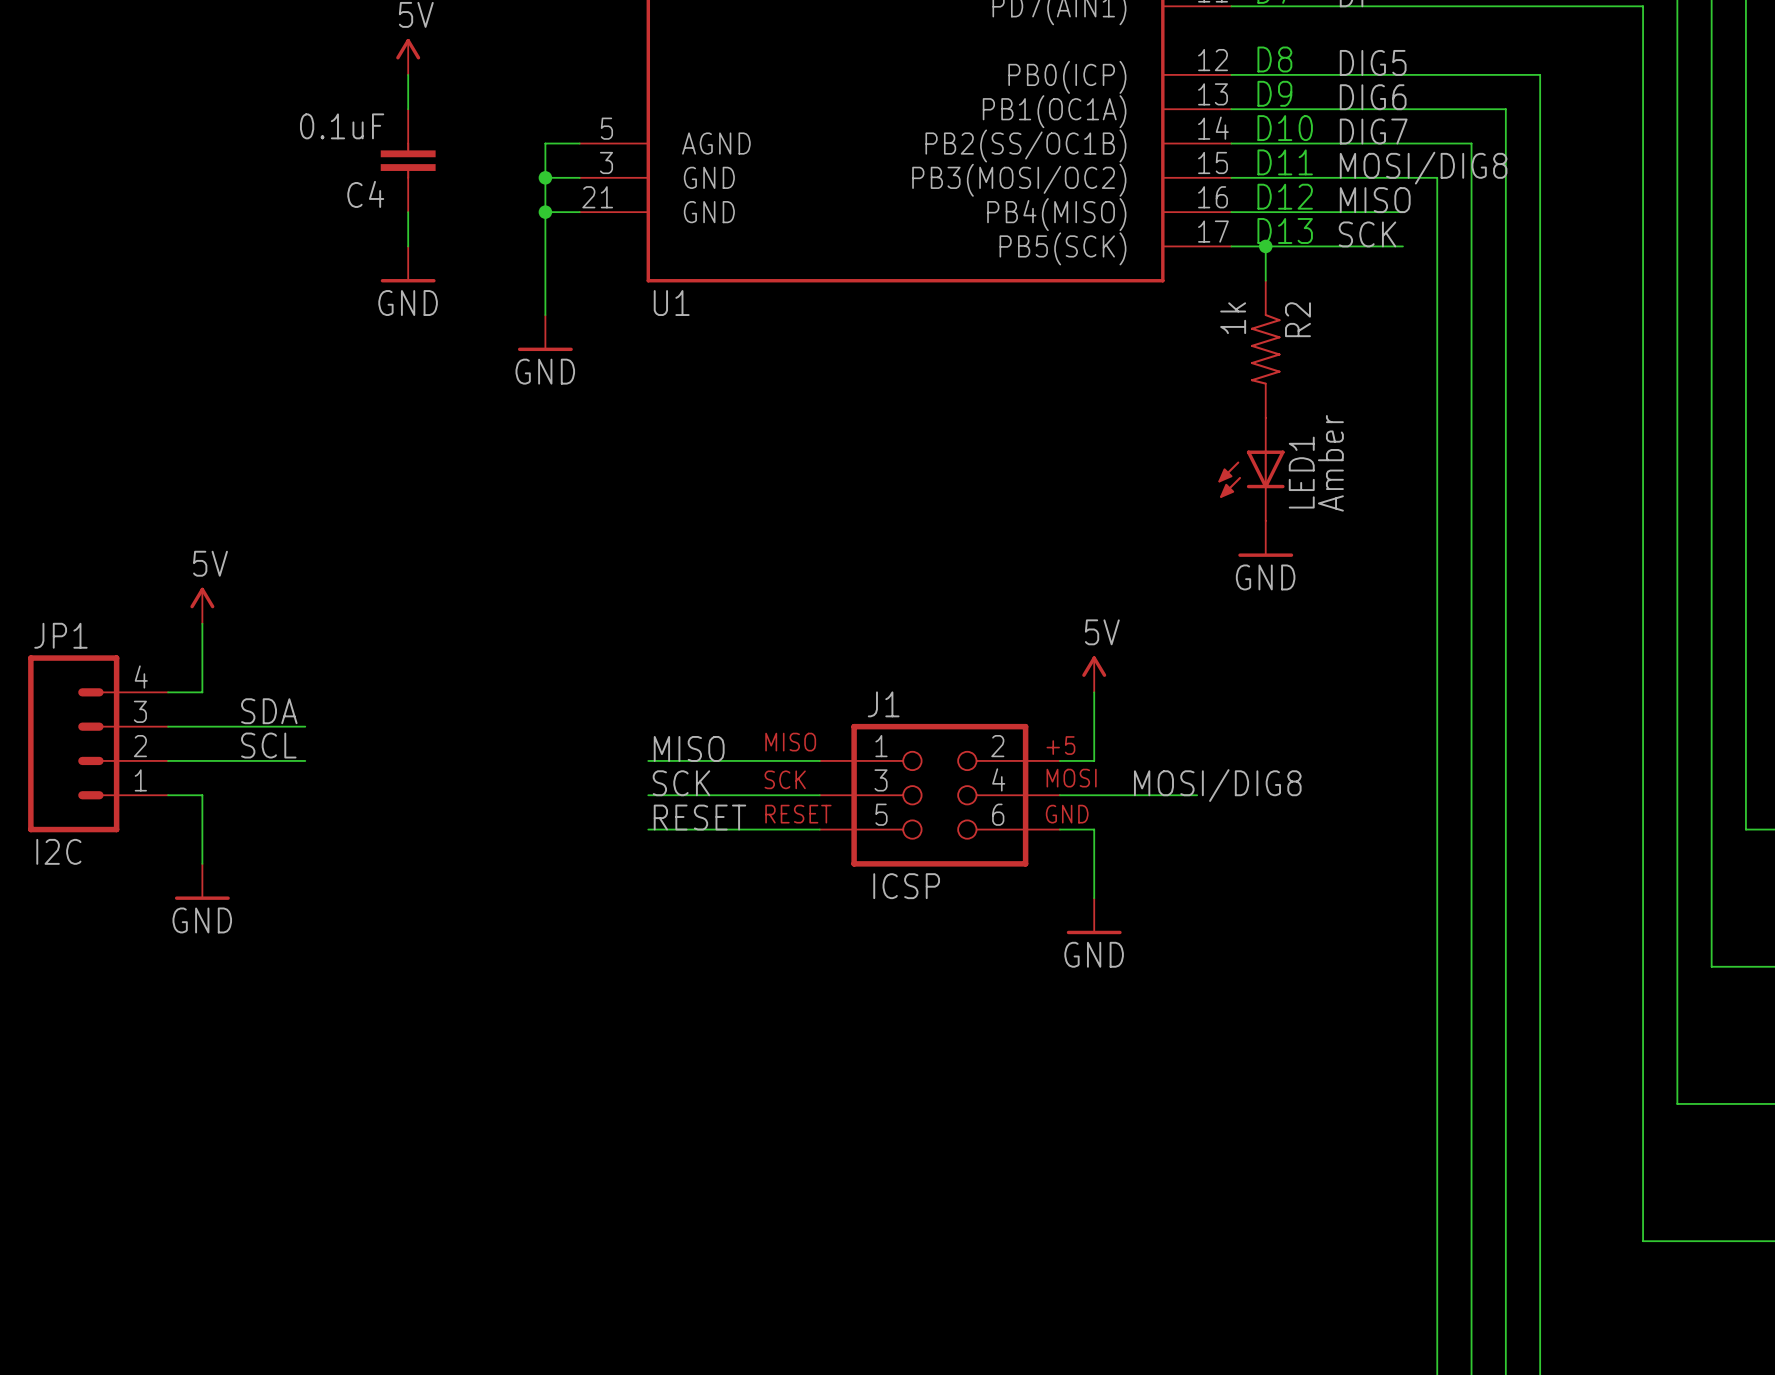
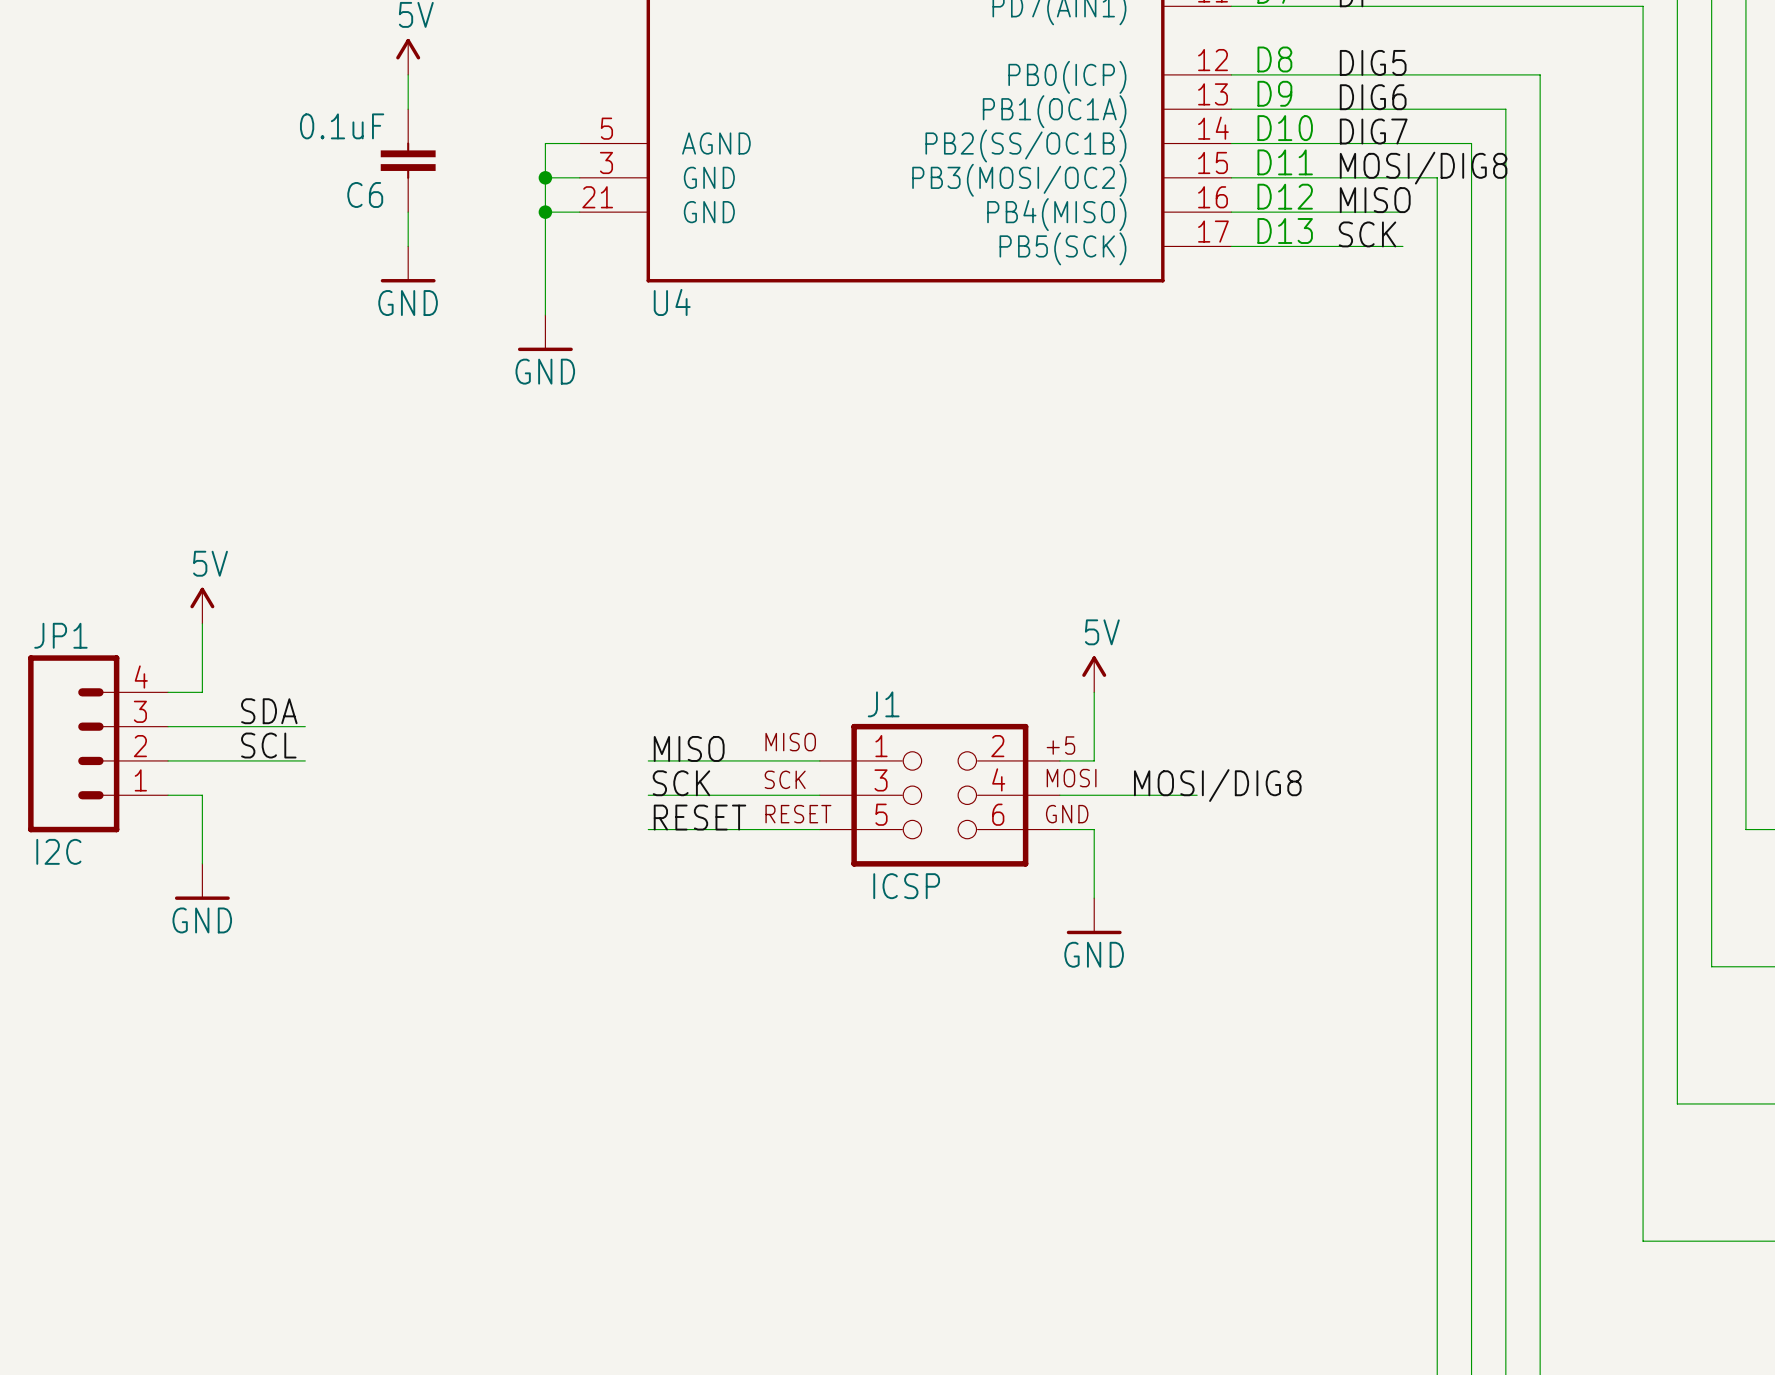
C4 name: C4 (365, 194) -> C6 (365, 194)
wire: (1265, 246) (1265, 280) -> none
junction: (1265, 246) -> none
U1 name: U1 (671, 303) -> U4 (672, 302)
R2: 1k (1265, 349) -> none
LED1: Amber (1251, 469) -> none
power symbol: GND (1265, 538) -> none

